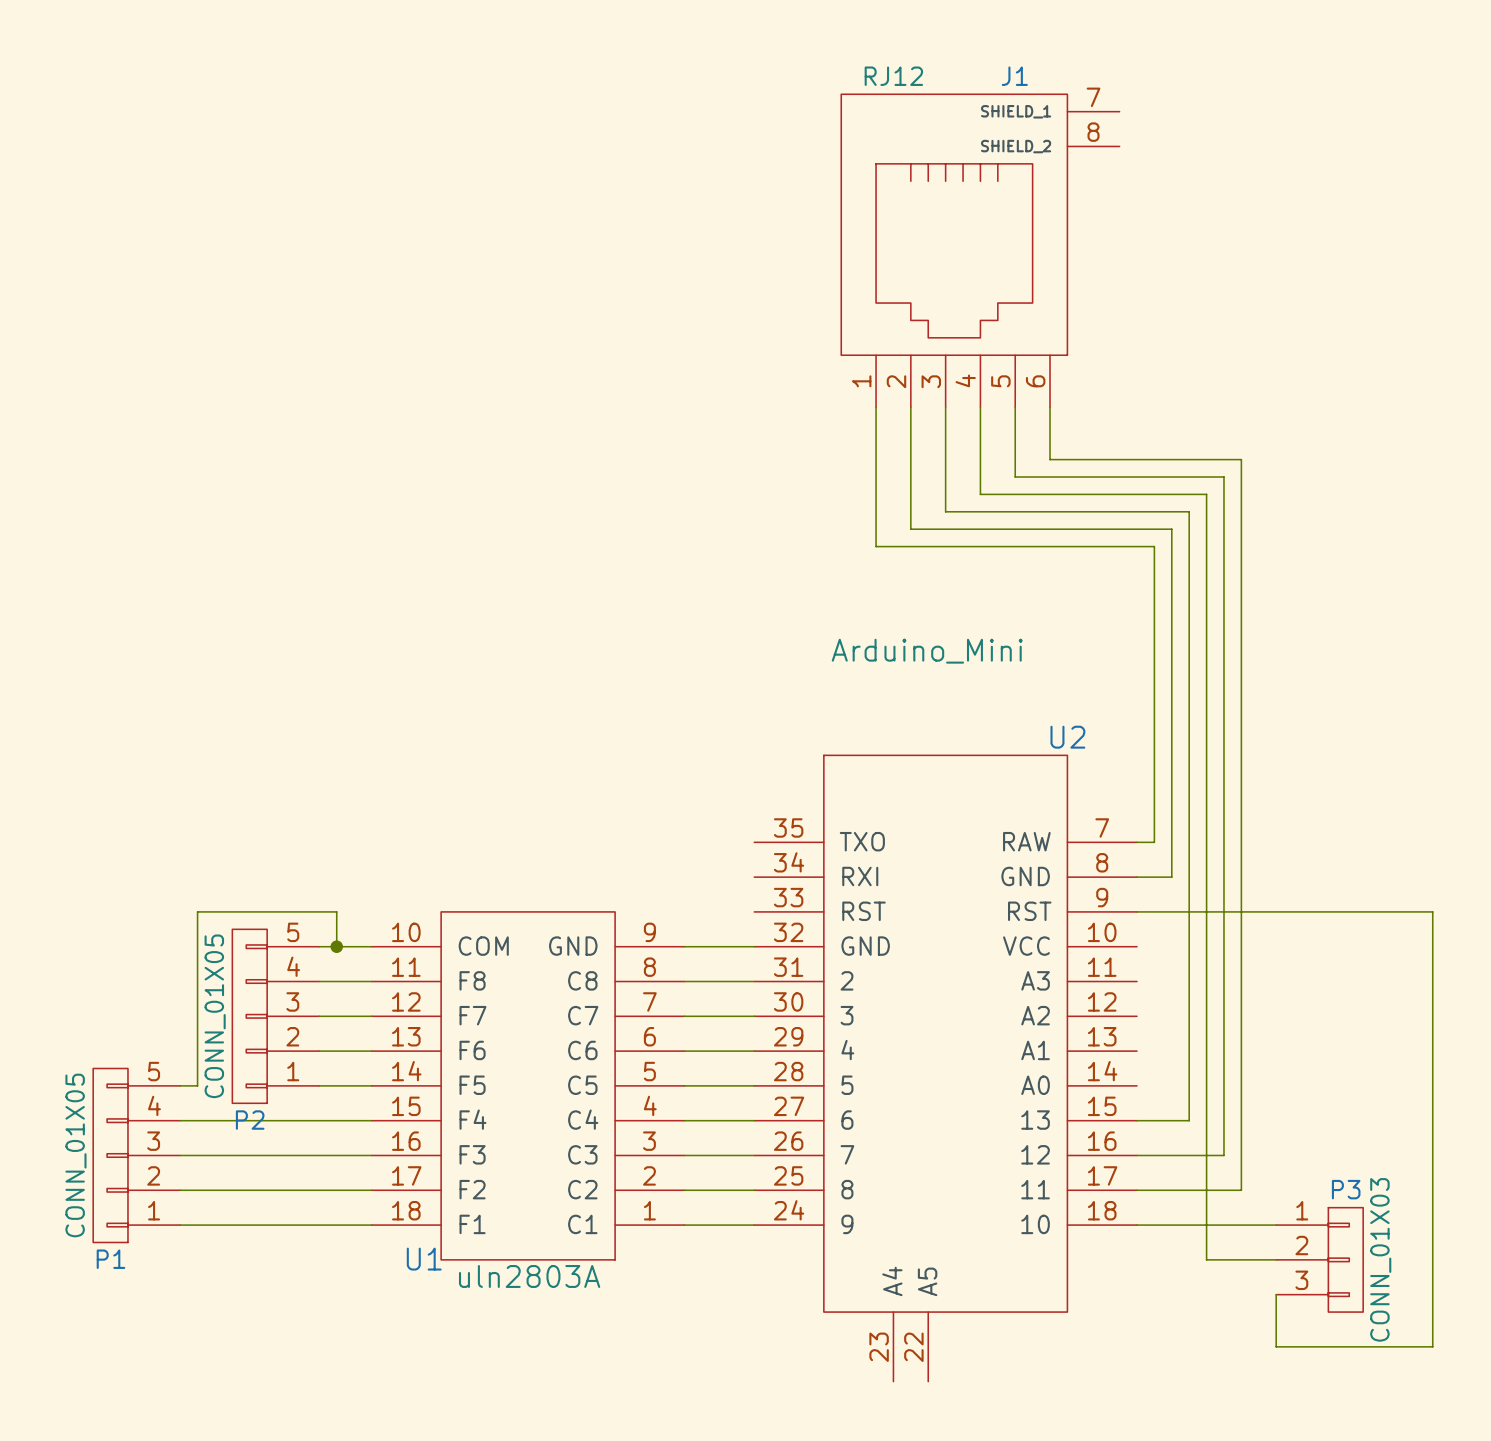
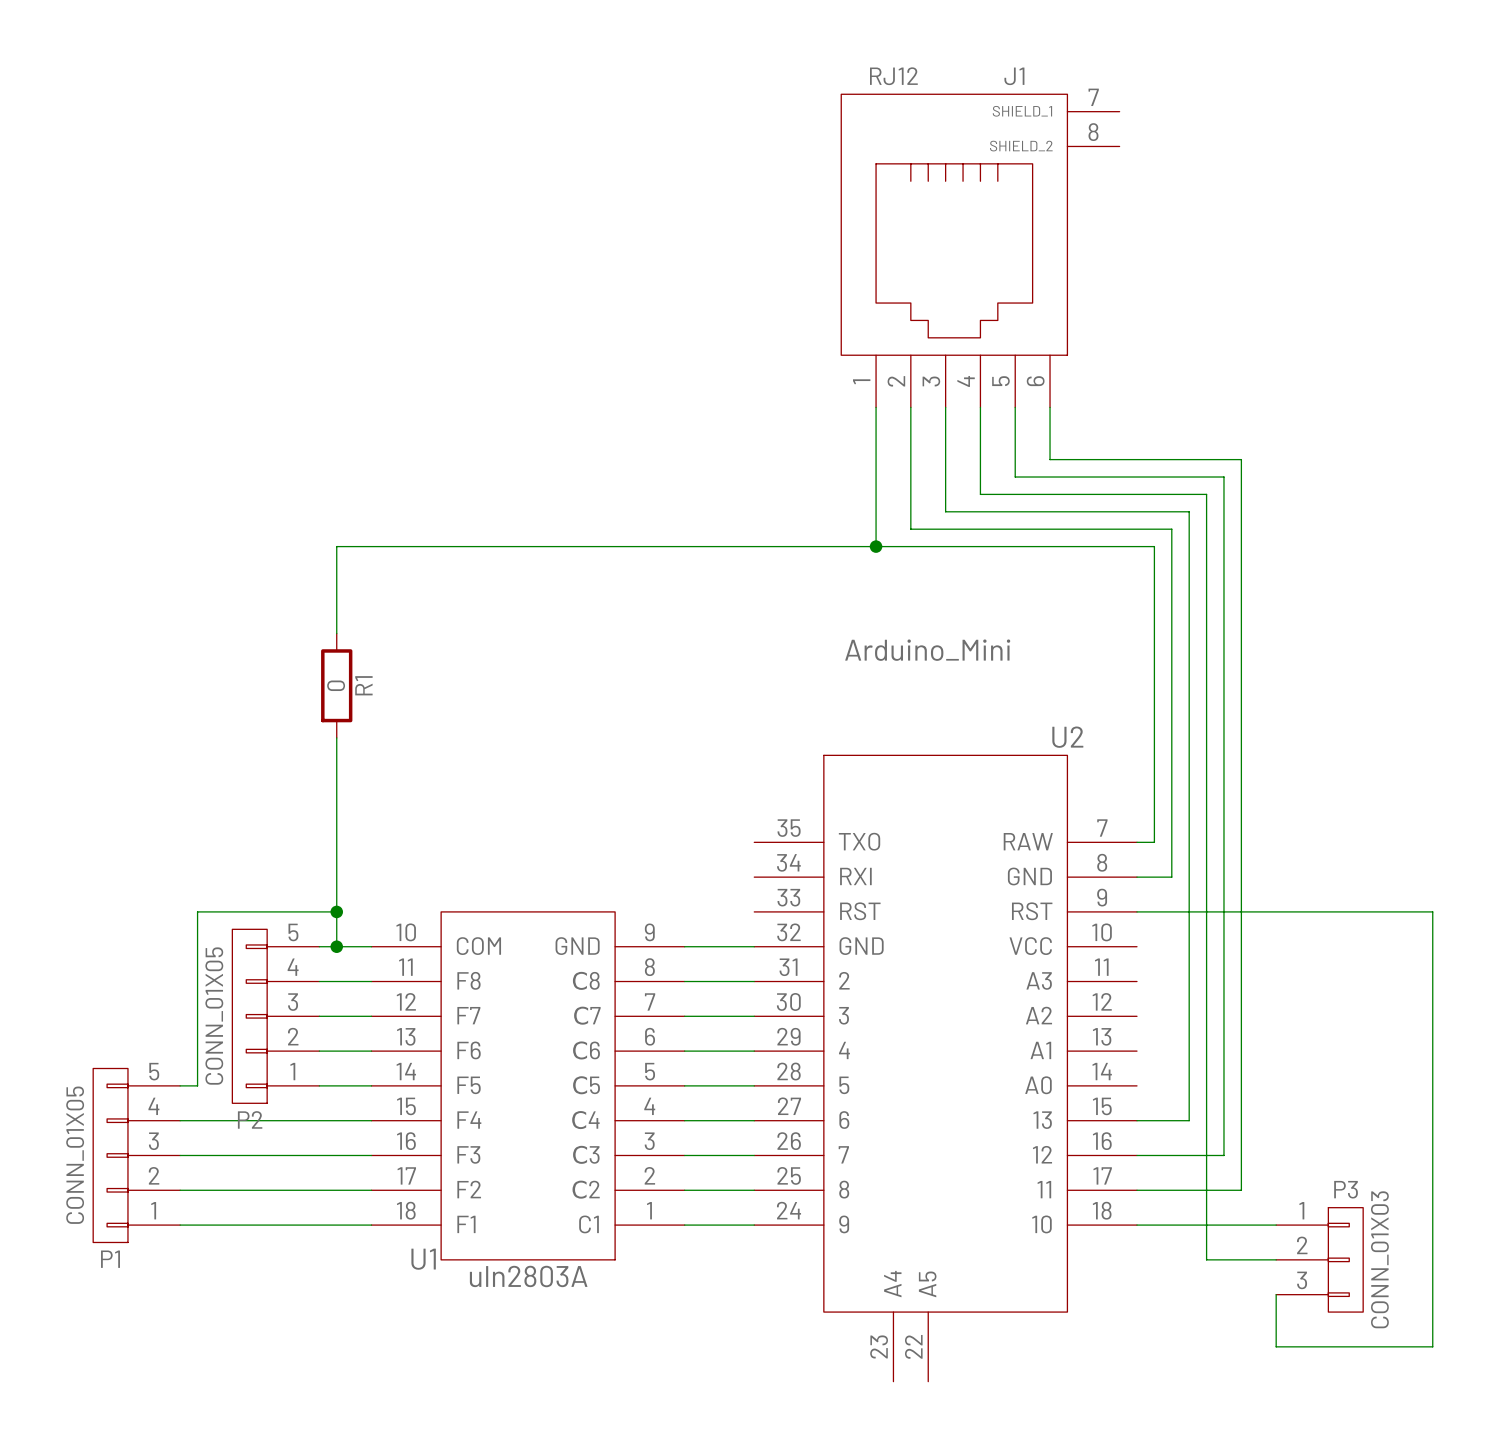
wire: none -> (876, 546) (336, 546) (336, 633)
junction: none -> (876, 546)
R1: none -> 0 (336, 685)
wire: none -> (336, 737) (336, 911)
junction: none -> (336, 911)

